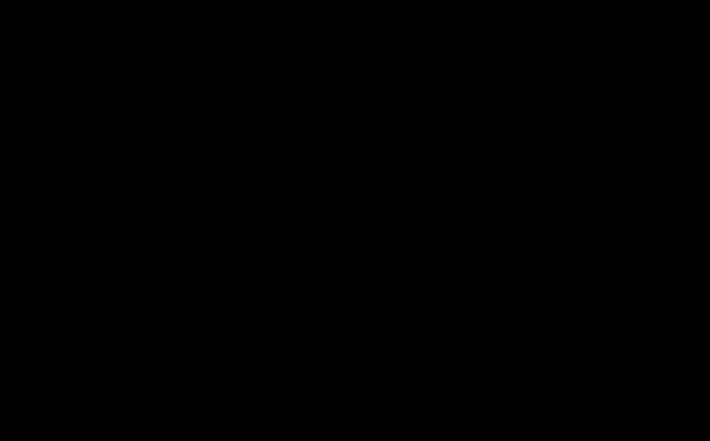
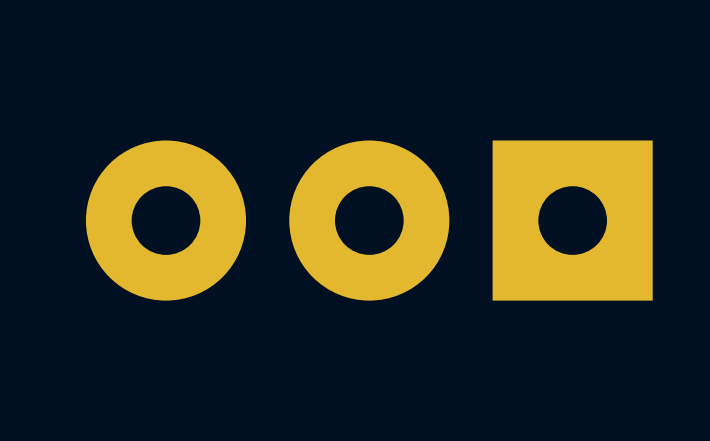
part: none -> (369, 220)

